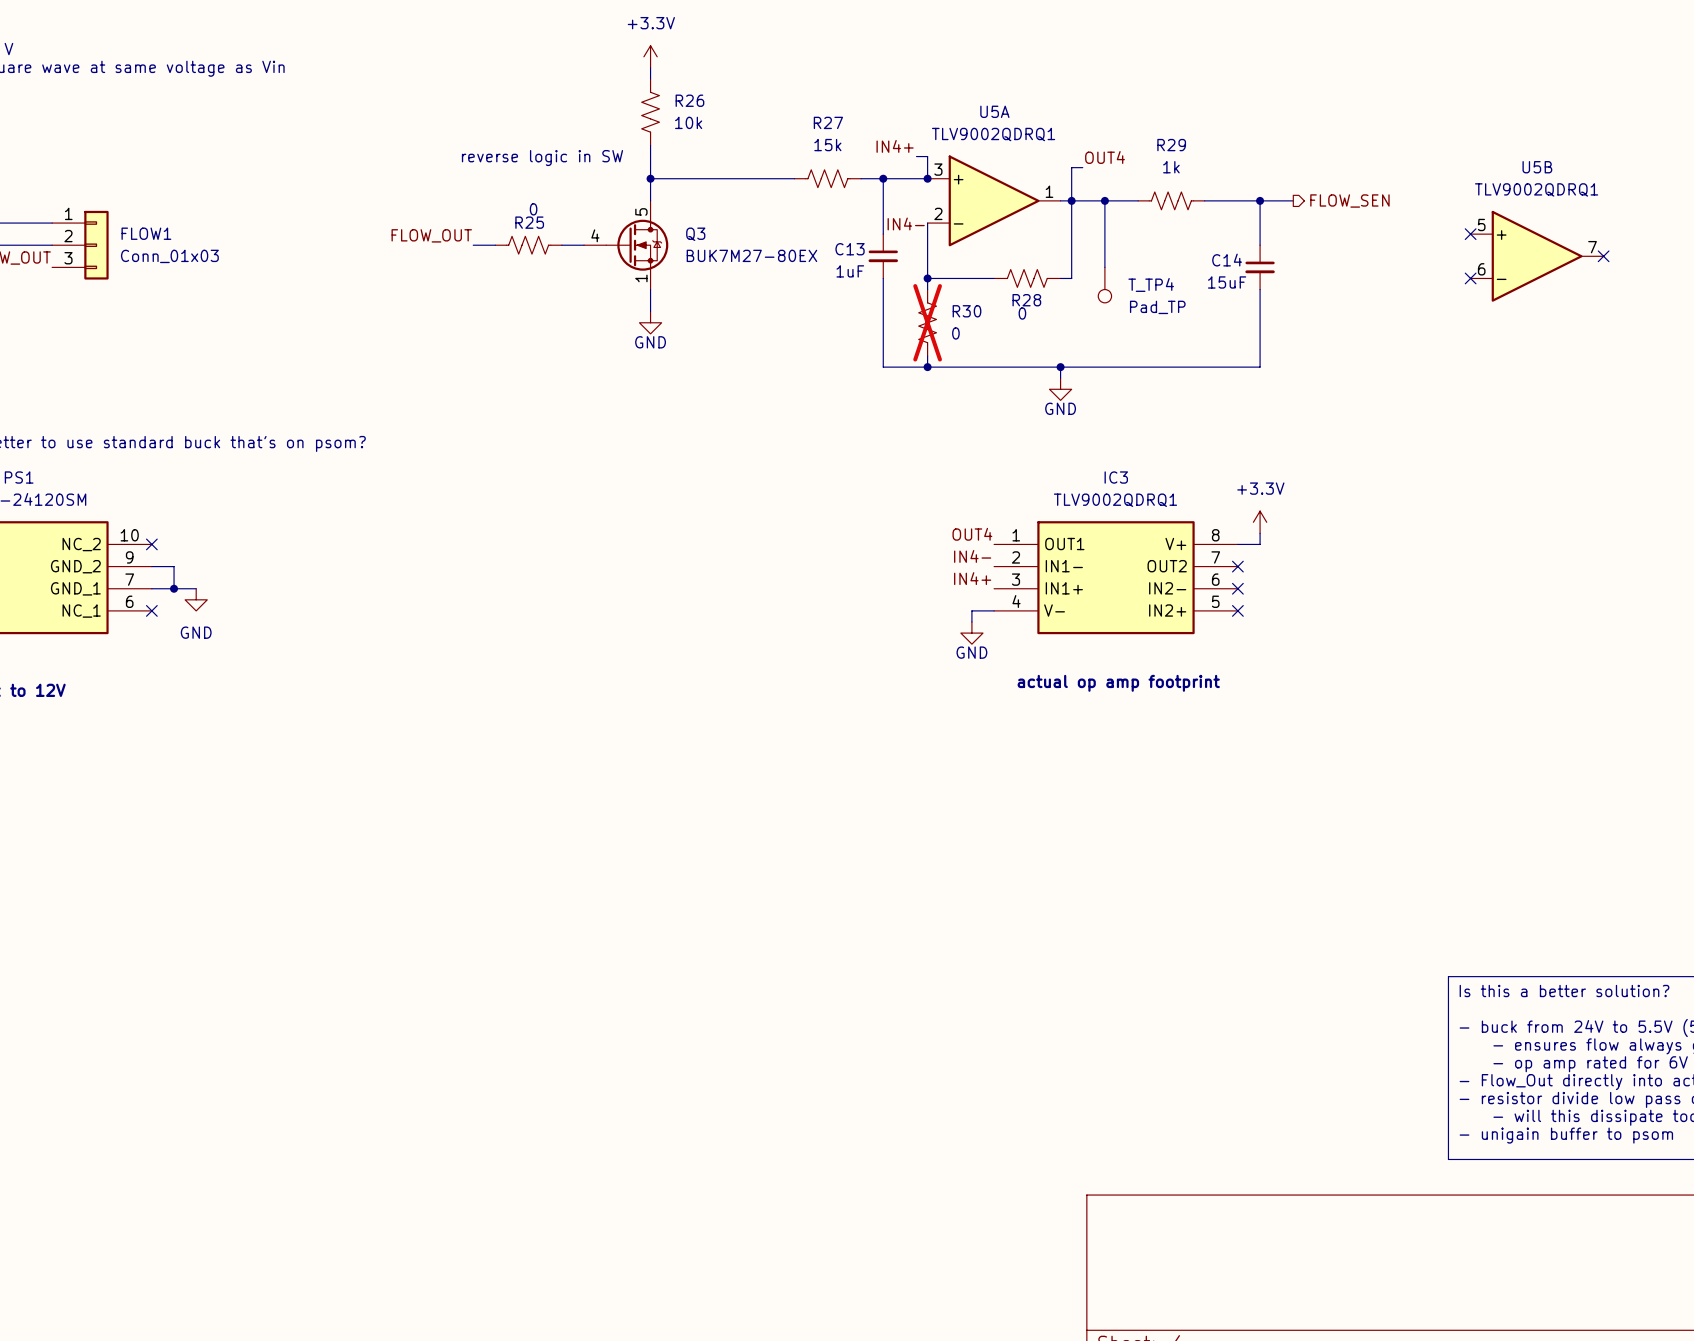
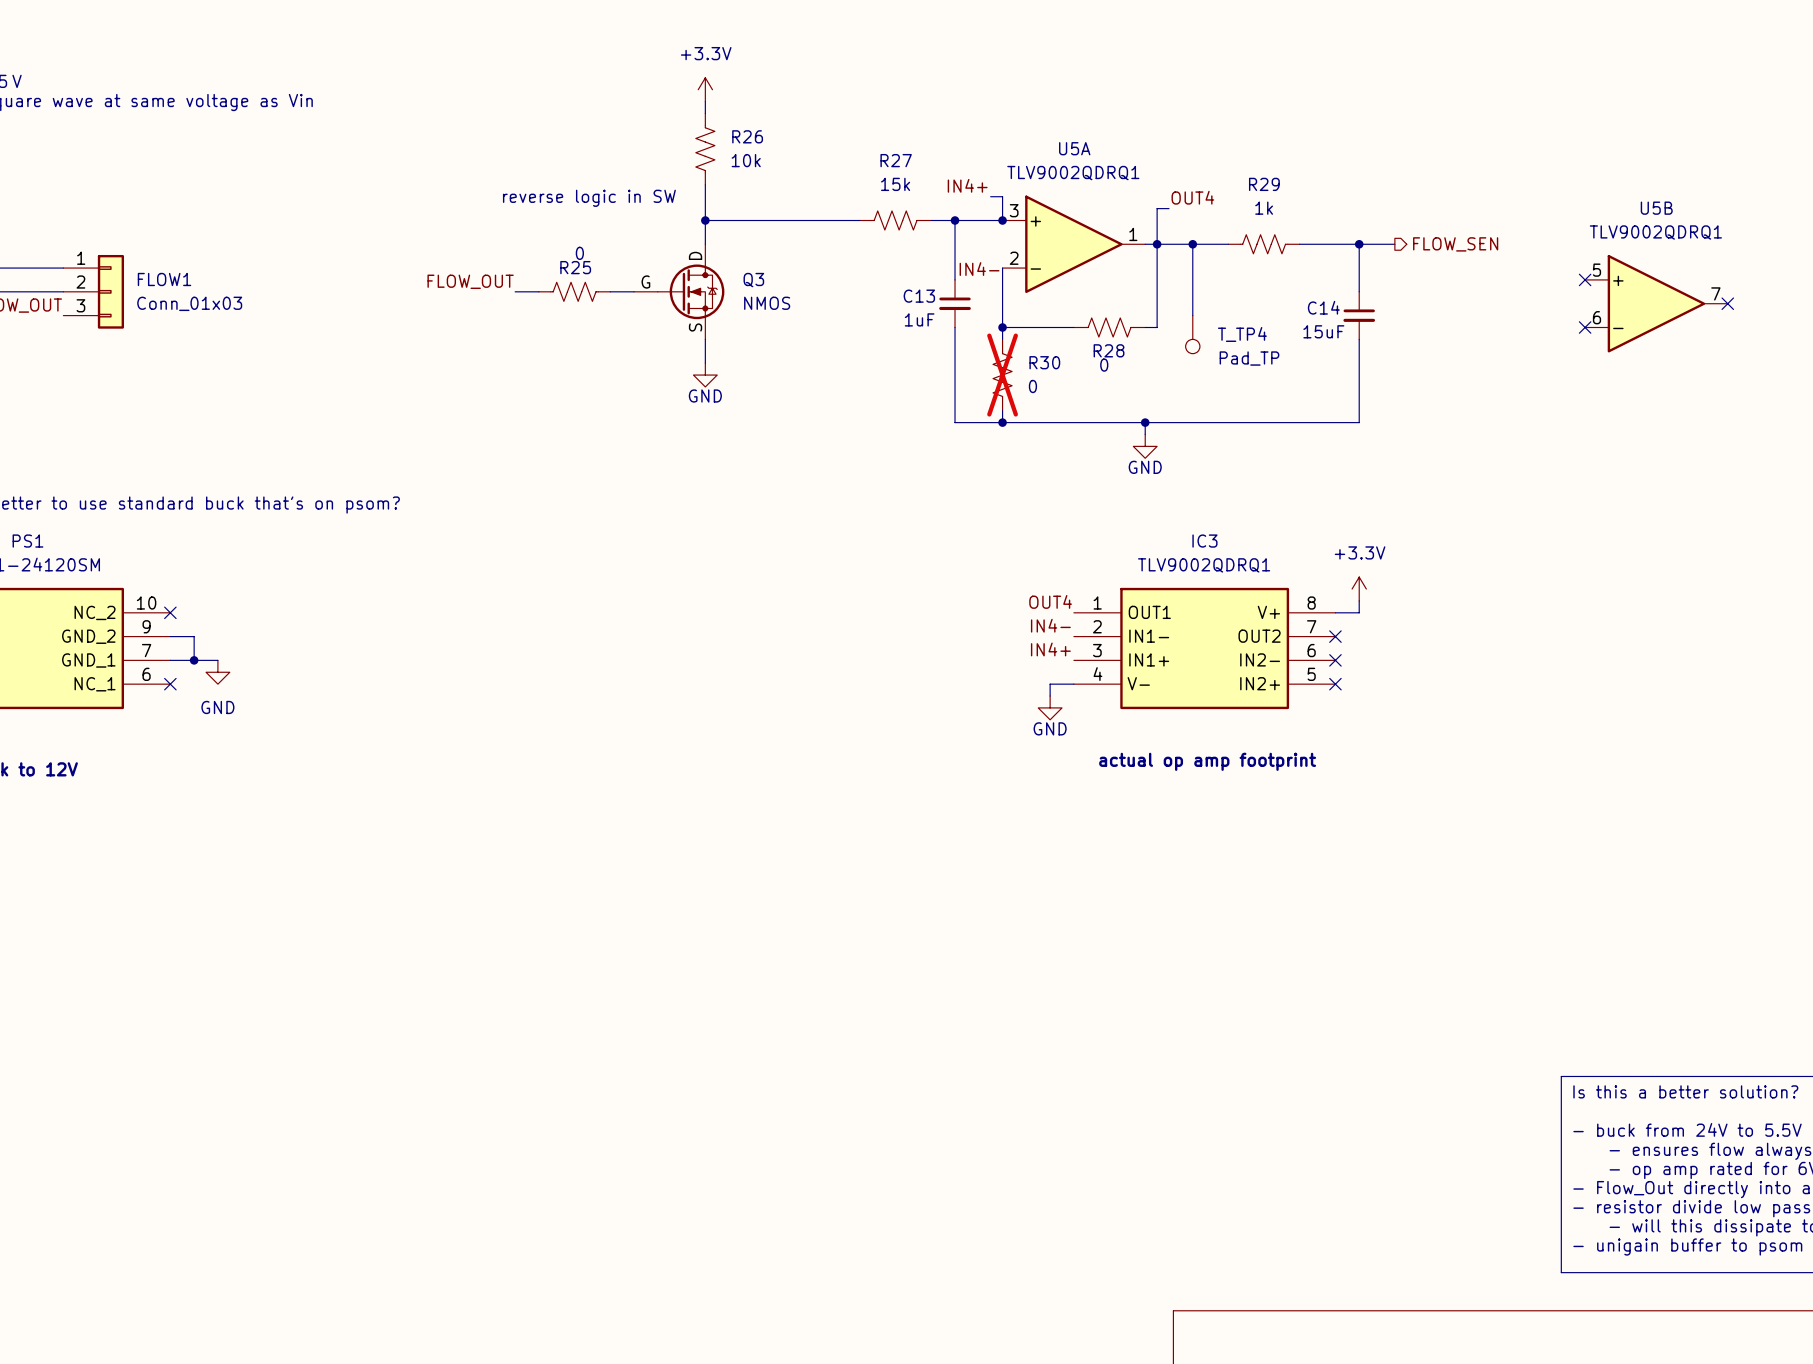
Q3 pin name: none -> D (695, 255)
Q3 pin number: 5 (641, 211) -> none
Q3 pin number: 4 (595, 235) -> none
Q3 pin name: none -> G (645, 282)
Q3 value: BUK7M27-80EX (751, 255) -> NMOS (767, 303)
Q3 pin name: none -> S (695, 327)
Q3 pin number: 1 (641, 278) -> none

